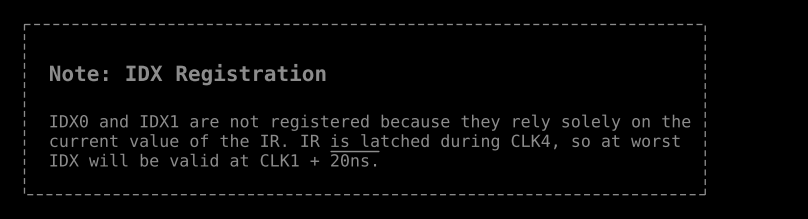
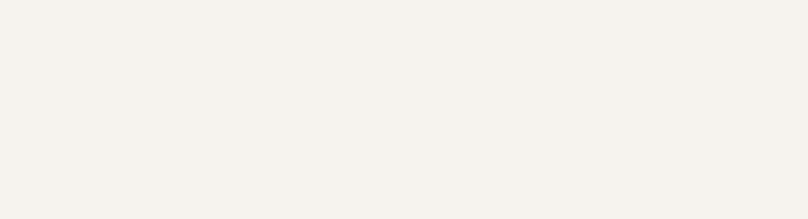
line: (24, 24) (705, 24) (705, 194) (24, 194) (24, 24) -> none
text: Note: IDX Registration (187, 74) -> none
text: IDX0 and IDX1 are not registered because they rely solely on the (370, 122) -> none
text: current value of the IR. IR is latched during CLK4, so at worst (364, 142) -> none
text: IDX will be valid at CLK1 + ~{20ns.} (214, 159) -> none

